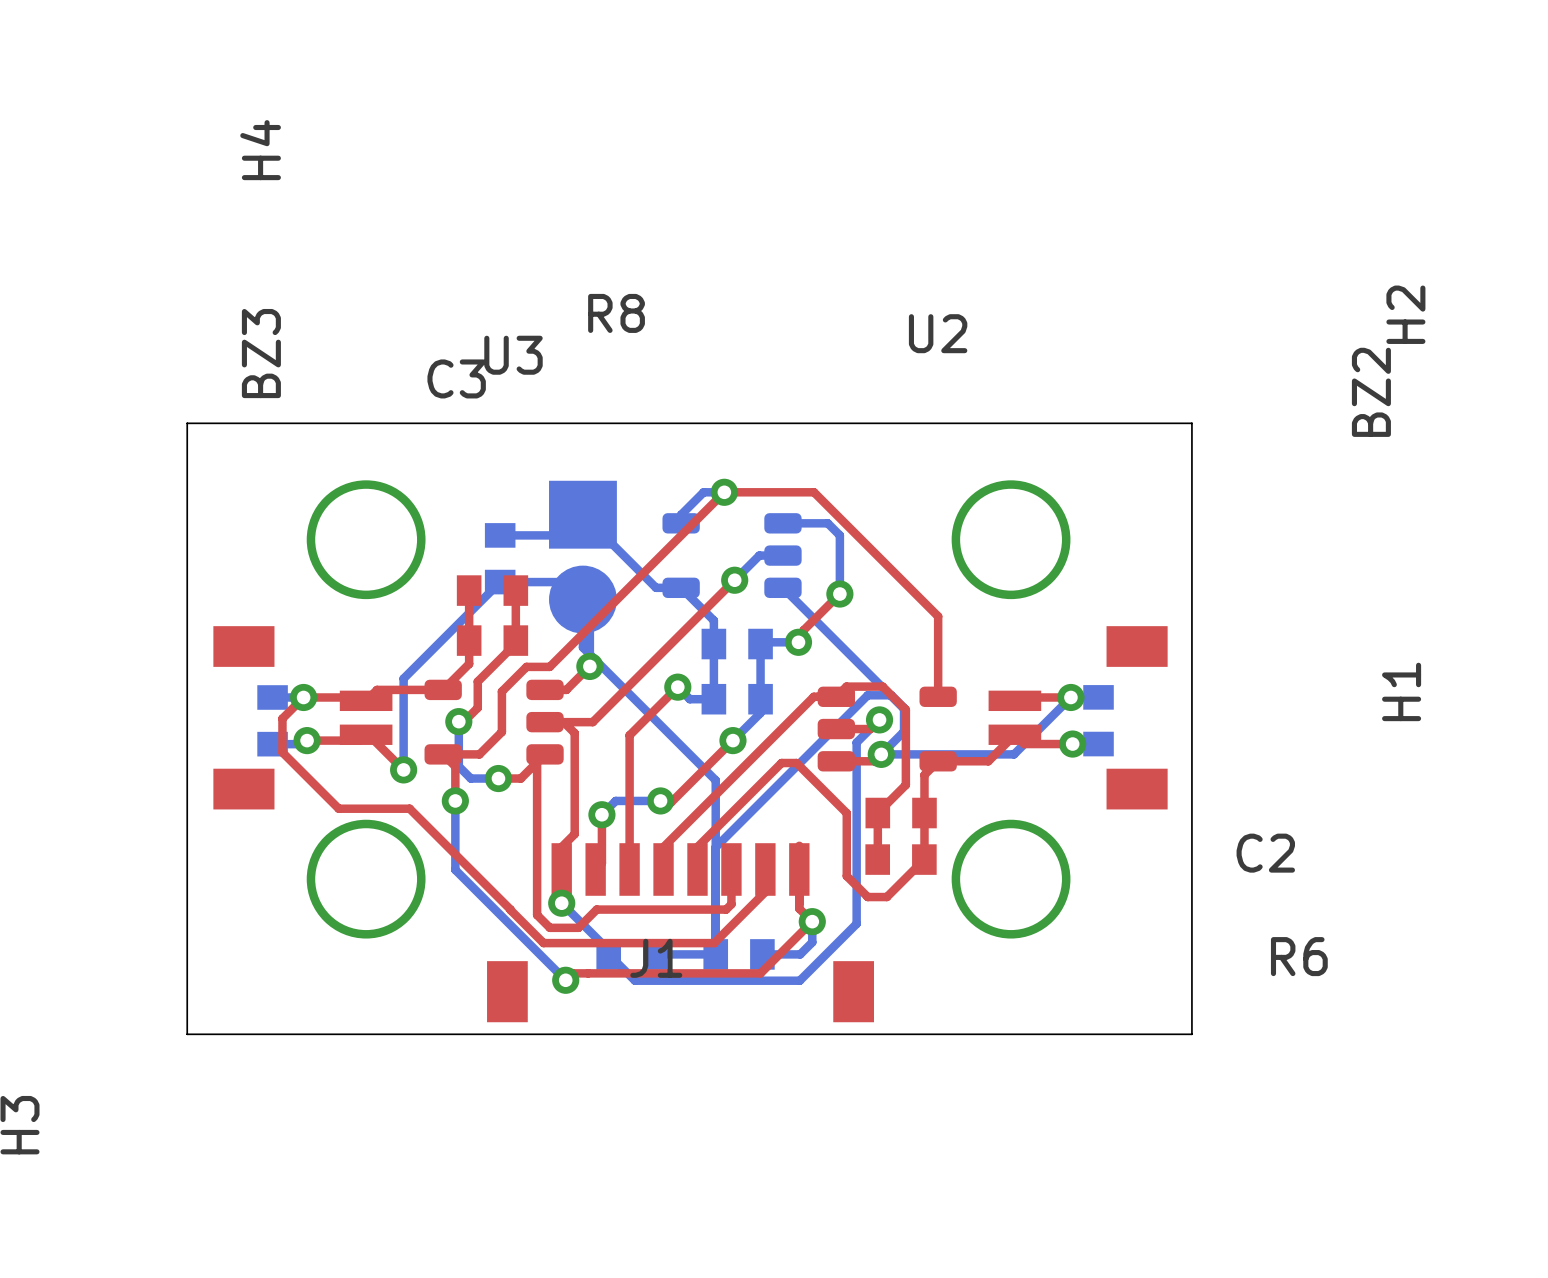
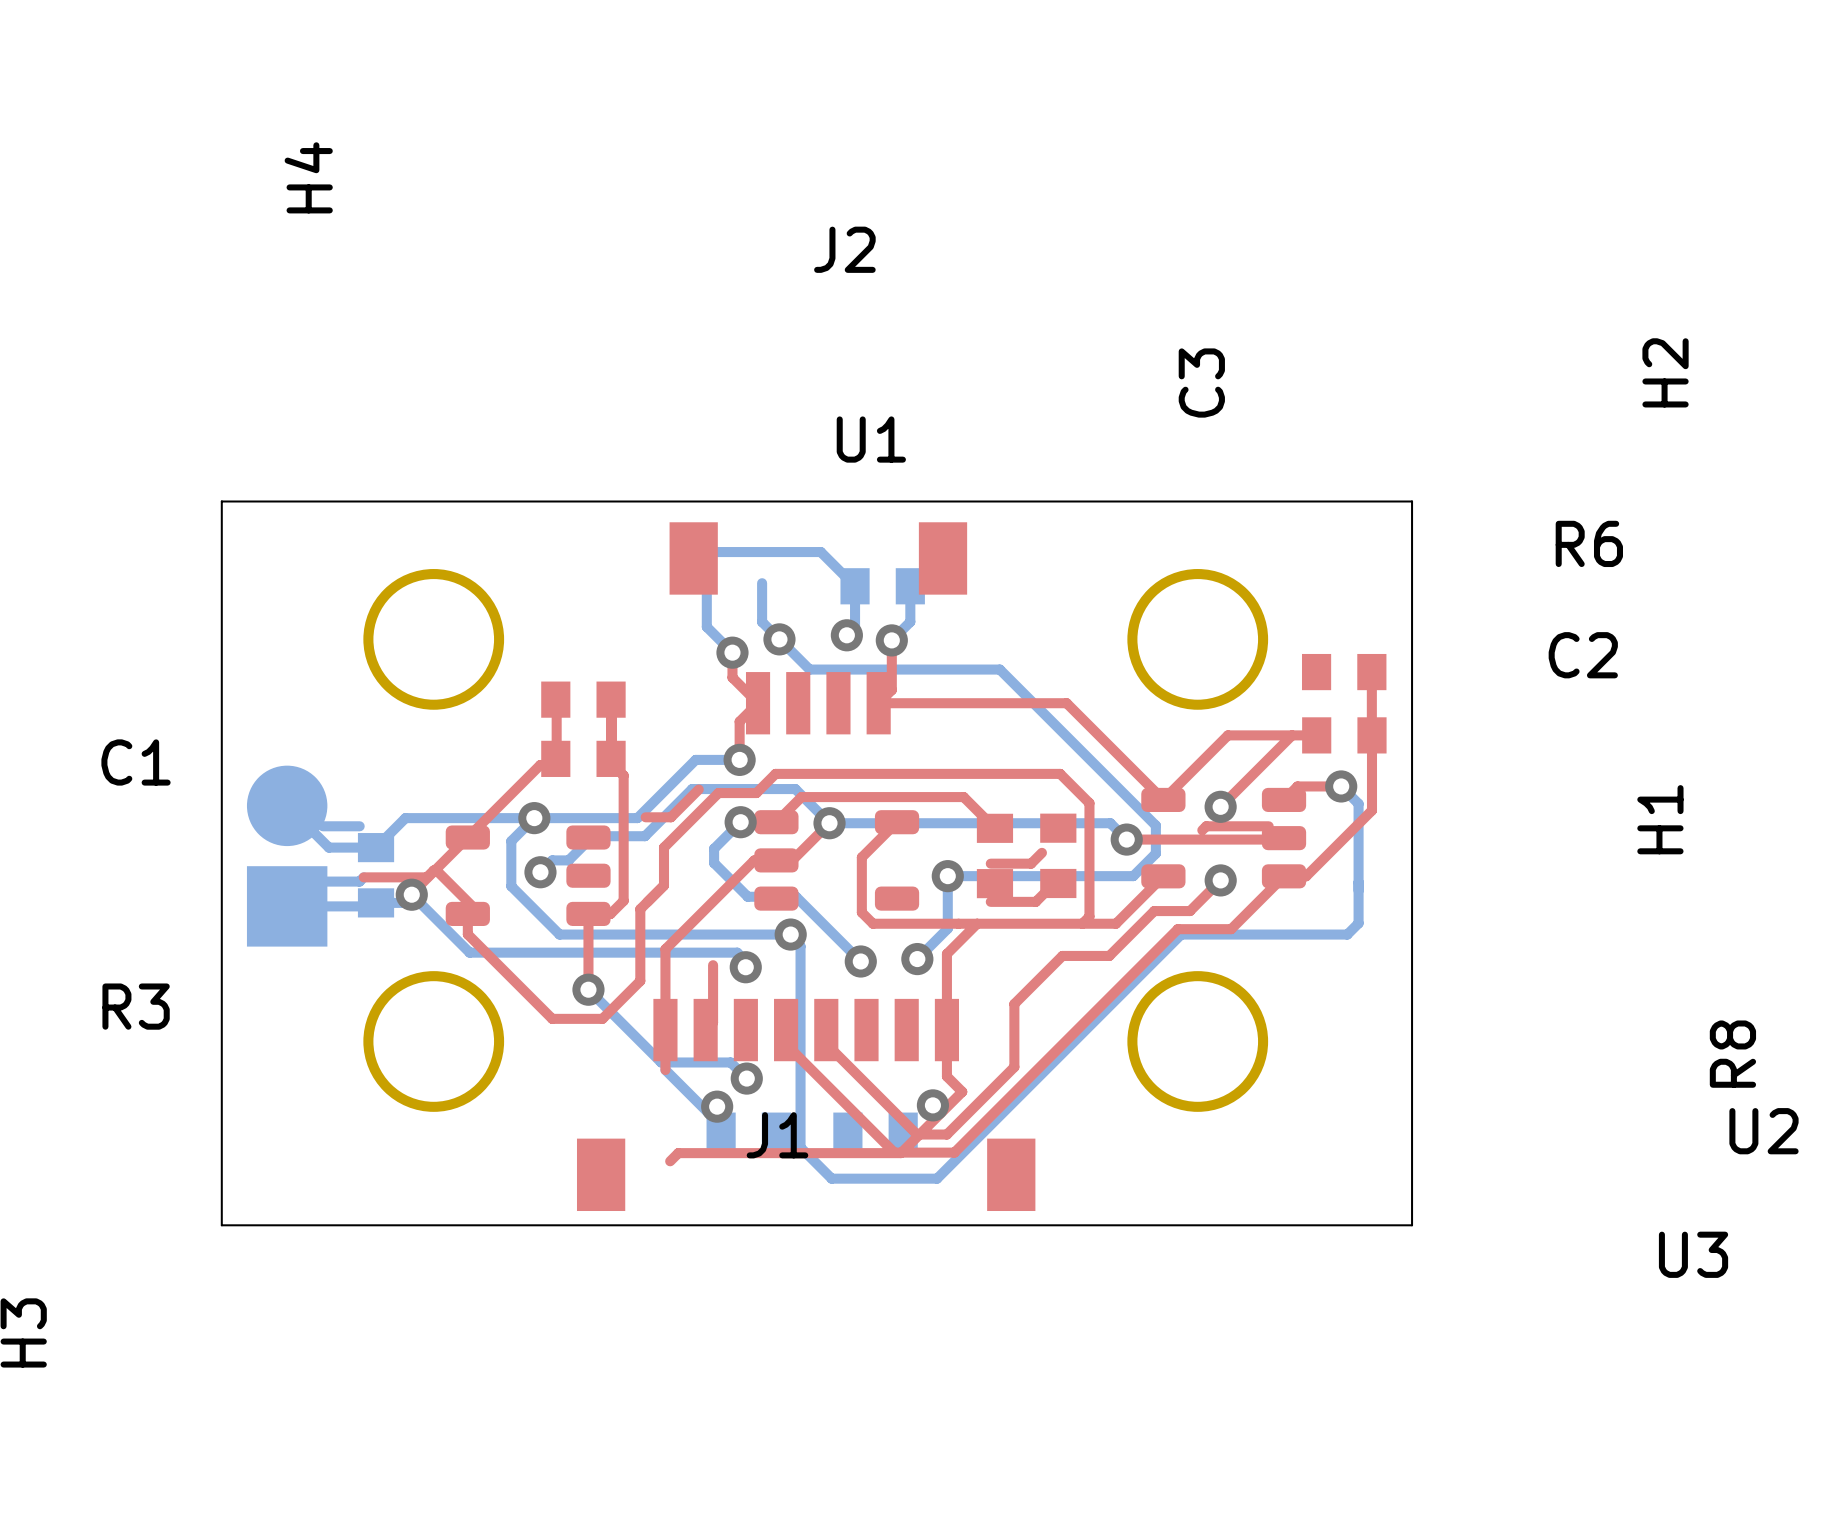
R8 name: R8 (616, 313) -> R3 (136, 1006)
U2 name position: U2 (938, 333) -> U2 (1763, 1131)
U3 name position: U3 (513, 355) -> U3 (1693, 1254)
C3 name: C3 (456, 378) -> C1 (136, 762)
bottom track: none -> (762, 583) (762, 622) (809, 669) (999, 669) (1155, 825) (1155, 853) (1133, 876) (947, 876) (947, 928) (917, 959)
bottom track: (724, 492) (703, 492) (681, 514) (681, 523) -> none
via: (724, 492) -> none
part: none -> (882, 586)
bottom track: none -> (910, 586) (910, 621) (891, 640)
bottom track: (782, 523) (827, 523) (839, 535) (839, 594) -> none
J2: none -> (818, 628)
bottom track: (500, 535) (562, 535) (582, 514) (656, 587) (681, 587) (713, 620) (713, 699) (689, 699) (677, 687) -> none
bottom track: none -> (846, 635) (855, 627) (855, 586) (820, 552) (709, 552) (706, 555) (706, 626) (732, 652)
via: none -> (846, 635)
via: none -> (779, 639)
top track: none -> (891, 640) (891, 690) (878, 703) (1066, 703) (1163, 799) (1227, 735) (1316, 735)
via: none -> (891, 640)
top track: none -> (732, 652) (732, 677) (758, 703) (739, 721) (739, 759)
via: none -> (732, 652)
U1 side: bottom (732, 555) -> top (528, 875)
bottom track: (782, 555) (759, 555) (734, 580) -> none
part rotation: 0° (582, 557) -> 180° (287, 856)
part position: (582, 557) -> (287, 856)
part: (500, 558) -> none
top track: none -> (1371, 672) (1371, 810) (1306, 876) (1284, 876) (1231, 929) (1177, 929) (954, 1152) (894, 1152) (786, 1044) (786, 1030)
top track: (734, 580) (592, 722) (545, 722) -> none
via: (734, 580) -> none
bottom track: (782, 587) (904, 708) -> none
top track: (469, 590) (469, 663) (443, 689) (377, 689) (366, 700) (362, 697) (303, 697) (282, 718) (282, 752) (338, 808) (409, 808) (510, 909) -> none
top track: none -> (556, 701) (557, 765) (540, 765) (411, 894)
top track: none -> (611, 701) (611, 763) (623, 775) (623, 900) (610, 913) (588, 913) (588, 989)
top track: (839, 594) (803, 630) (803, 637) (798, 642) -> none
via: (839, 594) -> none
bottom track: (582, 599) (582, 647) (715, 780) (715, 954) (655, 954) -> none
top track: none -> (1292, 735) (1219, 807)
bottom track: none -> (739, 757) (739, 759) (695, 759) (637, 818) (405, 818) (376, 847) (328, 847) (287, 805)
via: none -> (739, 759)
bottom track: (798, 642) (762, 642) (760, 644) (760, 713) (732, 740) -> none
via: (798, 642) -> none
top track: (515, 643) (477, 681) (477, 707) (467, 718) (458, 721) (460, 723) -> none
part: (737, 644) -> none
bottom track: none -> (1341, 786) (1358, 803) (1358, 923) (1347, 934) (1181, 934) (937, 1178) (831, 1178) (800, 1147) (800, 946) (790, 934)
top track: none -> (1341, 786) (1297, 786) (1284, 799)
via: none -> (1341, 786)
bottom track: (589, 666) (589, 606) (565, 582) (500, 582) (403, 678) (403, 769) -> none
via: (589, 666) -> none
via: none -> (1220, 806)
top track: (677, 687) (629, 735) (629, 869) -> none
via position: (677, 687) -> (829, 823)
bottom track: none -> (534, 818) (511, 841) (511, 886) (559, 934) (790, 934)
via: none -> (534, 818)
bottom track: none -> (740, 822) (714, 848) (714, 863) (747, 896) (796, 896) (861, 961)
top track: none -> (740, 822) (776, 822) (801, 797) (963, 797) (994, 828)
via: none -> (740, 822)
top track: none -> (897, 822) (861, 857) (861, 912) (873, 923) (1115, 923) (1163, 876)
top track: (938, 696) (938, 616) (814, 492) (724, 492) (549, 666) (526, 666) (501, 691) (501, 731) (479, 754) (443, 754) -> none
via: (303, 697) -> none
bottom track: (1070, 697) (1014, 754) (881, 754) (904, 731) (904, 708) (891, 695) (867, 695) (715, 847) -> none
via: (1070, 697) -> none
part: (737, 699) -> none
bottom track: none -> (1126, 839) (1110, 823) (829, 823) (795, 789) (692, 789) (644, 836) (592, 836) (568, 860) (552, 860) (539, 873)
top track: none -> (1126, 839) (1282, 839)
via: none -> (1126, 839)
BZ3: (302, 717) -> none
BZ2: (1078, 717) -> none
bottom track: (879, 719) (856, 742) (856, 923) (799, 980) (635, 980) (605, 950) -> none
via: (879, 719) -> none
part position: (272, 720) -> (376, 875)
part: (1098, 720) -> none
bottom track: (458, 721) (458, 766) (470, 778) (498, 778) -> none
via position: (458, 721) -> (540, 872)
U3 rotation: 0° (494, 722) -> 180° (836, 860)
U3 position: (494, 722) -> (836, 860)
top track: (563, 722) (574, 733) (574, 834) (561, 847) -> (829, 823) (792, 860) (754, 860) (665, 949) (665, 1003)
C3: none -> (994, 855)
R8: none -> (1058, 855)
U2 rotation: 0° (887, 729) -> 180° (1223, 838)
U2 position: (887, 729) -> (1223, 838)
via: none -> (947, 876)
via: (307, 740) -> none
top track: (732, 740) (670, 802) (660, 800) (658, 802) -> none
via: (732, 740) -> none
top track: none -> (1220, 880) (1190, 911) (1154, 911) (1109, 955) (1062, 955) (1014, 1004) (1014, 1067) (946, 1134) (917, 1134) (826, 1043) (826, 1030)
via: none -> (1220, 880)
top track: (1072, 744) (1024, 744) (1014, 734) (988, 761) (938, 761) (924, 774) (924, 859) (886, 897) (867, 897) (846, 876) (846, 813) (796, 763) (781, 763) (697, 847) (697, 858) -> none
via: (1072, 744) -> none
top track: (443, 754) (455, 766) (455, 800) -> none
top track: (545, 754) (520, 778) (498, 778) -> none
via: (881, 754) -> none
via: none -> (411, 894)
top track: (537, 762) (537, 915) (549, 927) (578, 927) (596, 909) (726, 909) (731, 904) (731, 869) -> none
bottom track: none -> (287, 906) (372, 906) (376, 902) (403, 902) (411, 894) (469, 952) (737, 952) (745, 961) (745, 967)
via: (403, 769) -> none
top track: none -> (467, 913) (467, 934) (552, 1018) (602, 1018) (640, 981) (640, 909) (664, 885) (664, 847) (718, 793) (756, 793) (775, 773) (1060, 773) (1089, 803) (1089, 916) (1082, 923)
via: (498, 778) -> none
top track: none -> (977, 923) (946, 954) (946, 1002)
bottom track: (455, 800) (455, 869) (565, 980) -> none
via: (455, 800) -> none
bottom track: (660, 800) (615, 800) (601, 814) -> none
via position: (660, 800) -> (790, 934)
via: none -> (917, 959)
via: none -> (860, 961)
C2 position: (901, 813) -> (1344, 735)
via: (601, 814) -> none
via: none -> (745, 967)
bottom track: none -> (588, 989) (661, 1062) (730, 1062) (746, 1078)
via: none -> (588, 989)
C2 name position: C2 (1265, 853) -> C2 (1583, 655)
top track: (663, 858) (663, 847) (813, 696) (836, 696) (846, 686) (882, 686) (905, 709) (905, 784) (877, 813) (877, 859) -> none
R6 position: (901, 859) -> (1344, 672)
top track: (765, 869) (765, 891) (714, 943) (543, 943) (510, 910) -> none
via: (561, 903) -> none
via: none -> (746, 1078)
bottom track: (812, 921) (812, 942) (800, 954) (762, 954) -> none
via position: (812, 921) -> (932, 1105)
via: none -> (717, 1106)
R6 name position: R6 (1299, 956) -> R6 (1589, 543)
via: (565, 980) -> none

